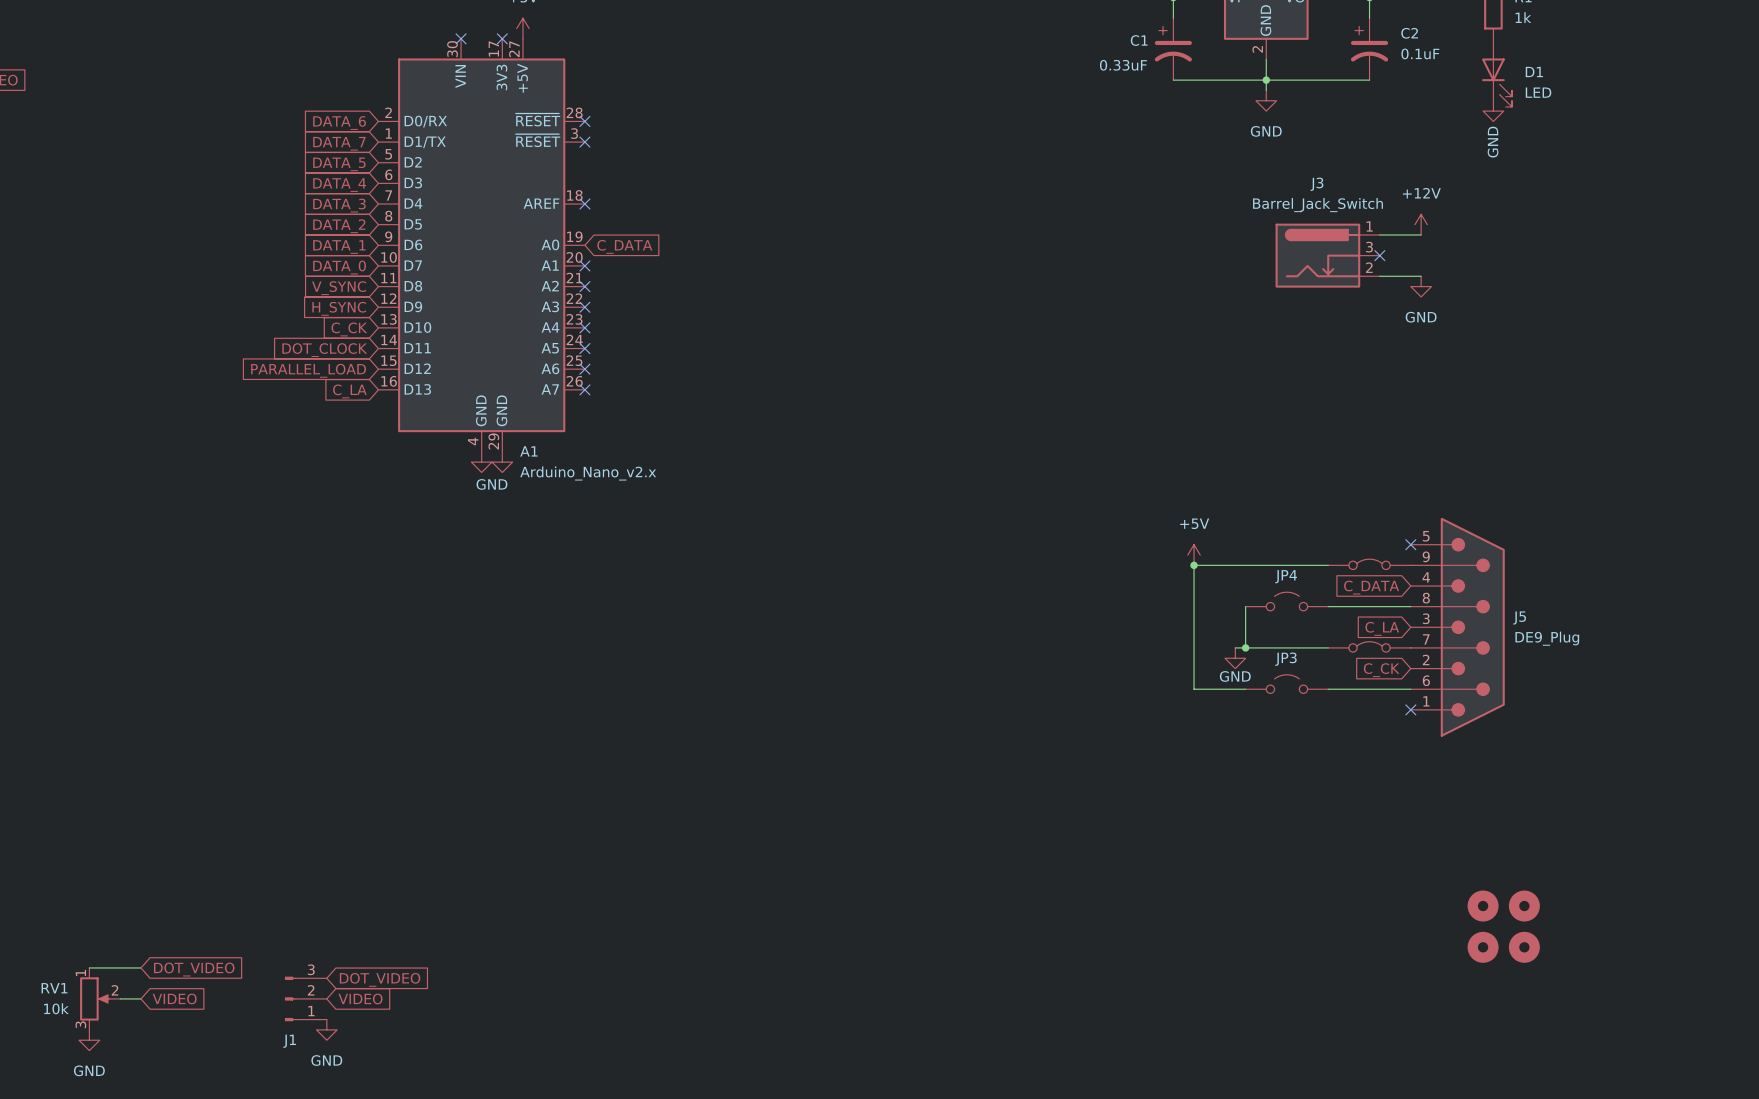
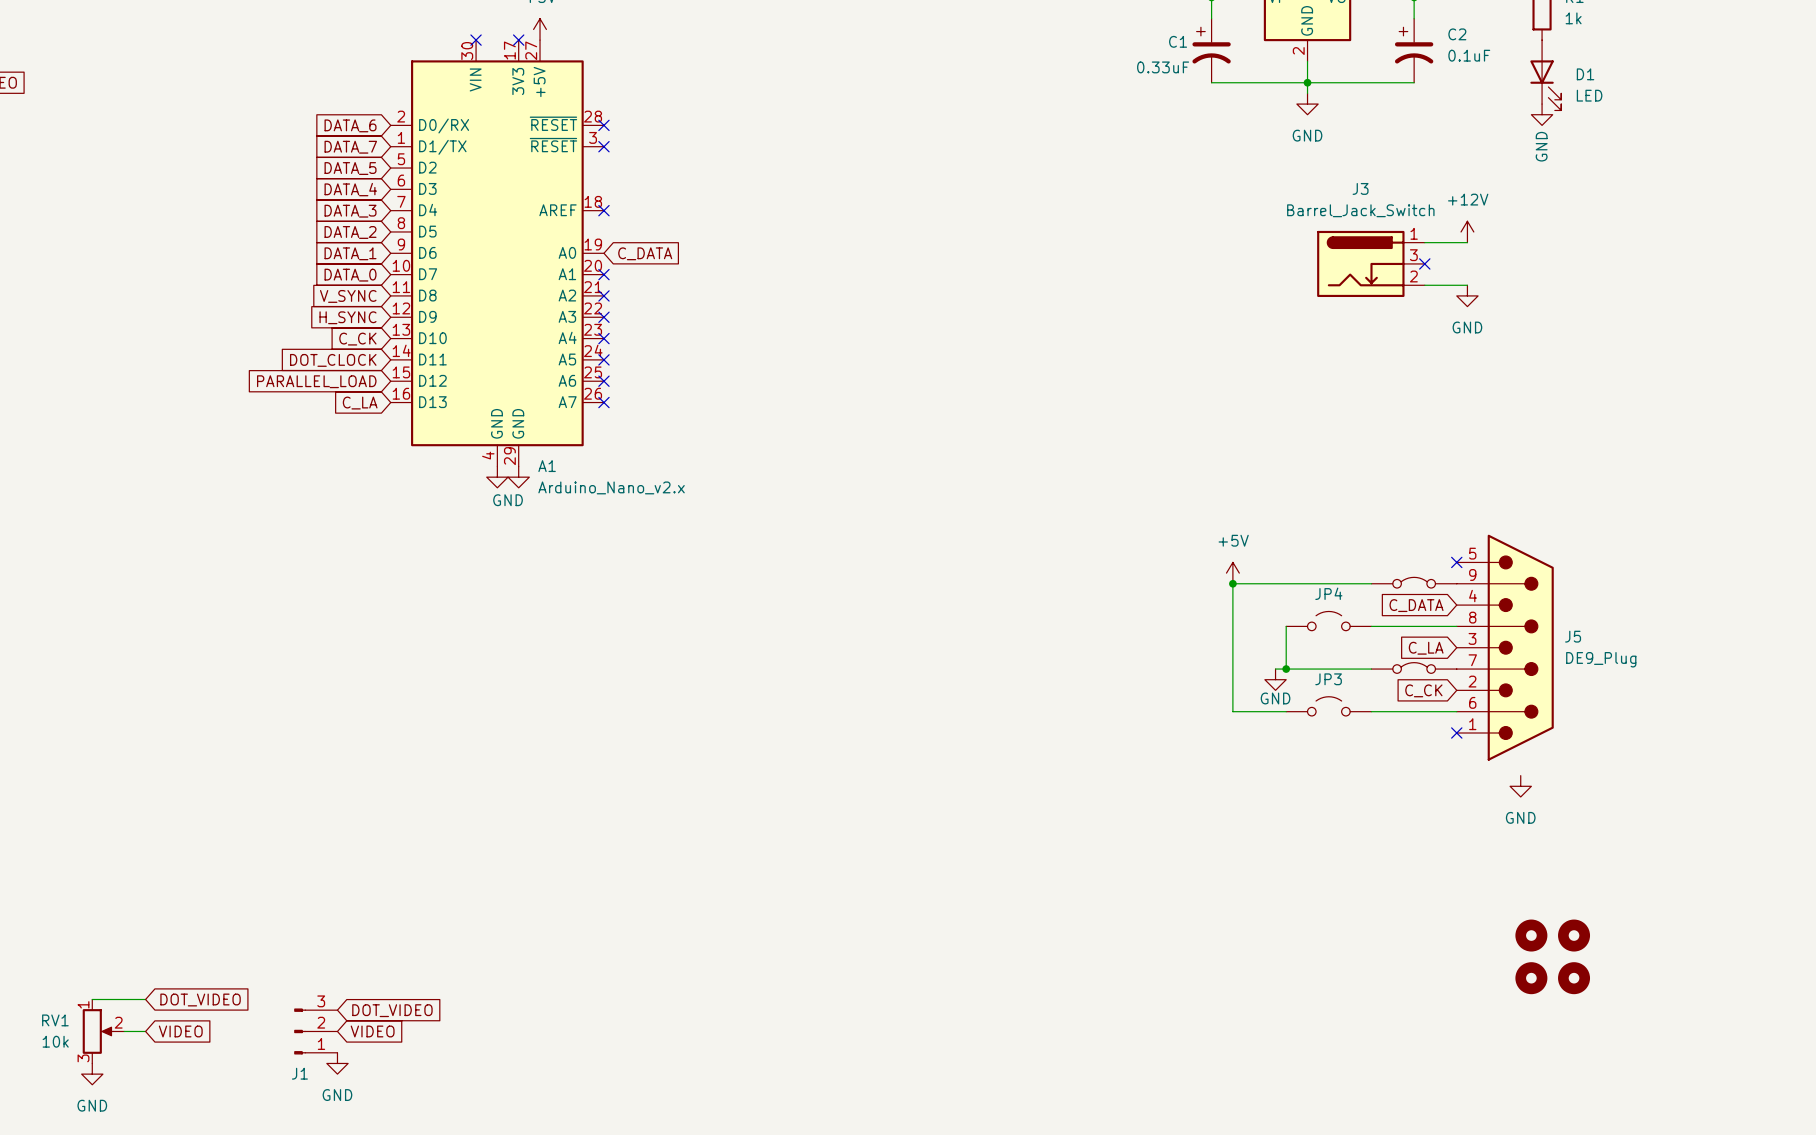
power symbol: none -> GND (1520, 786)

